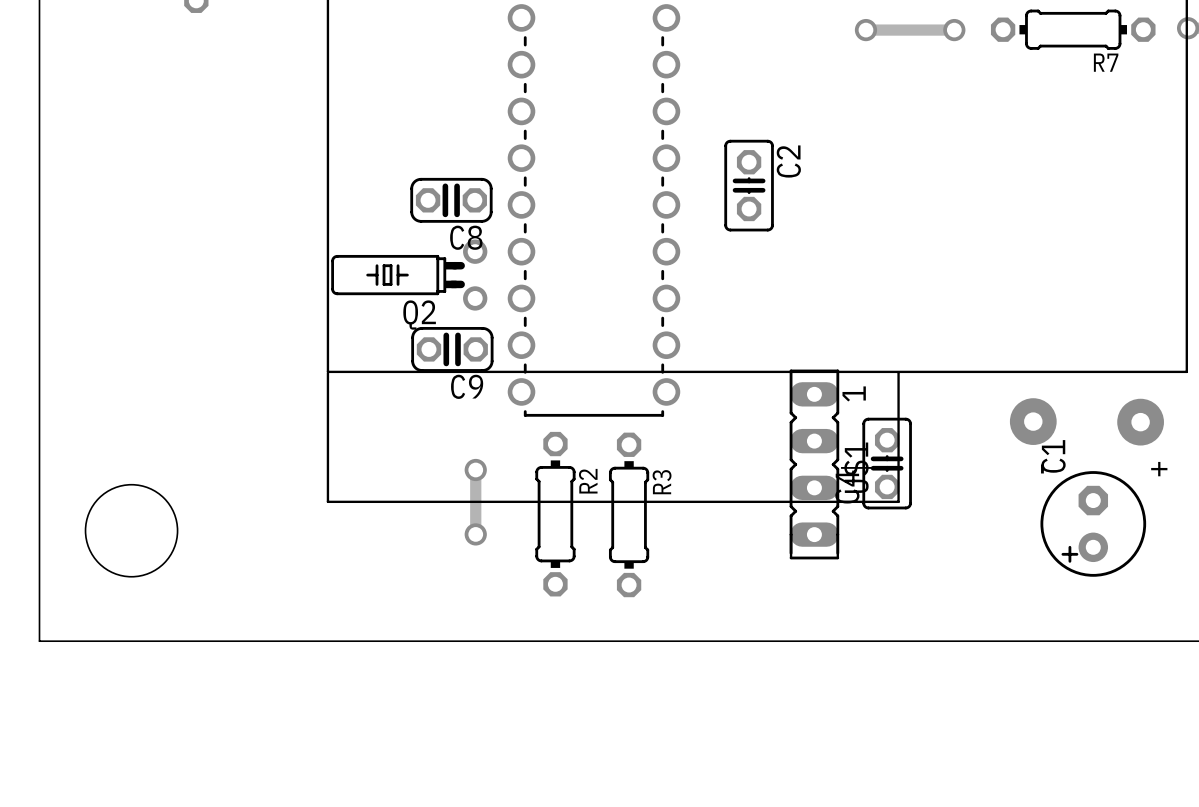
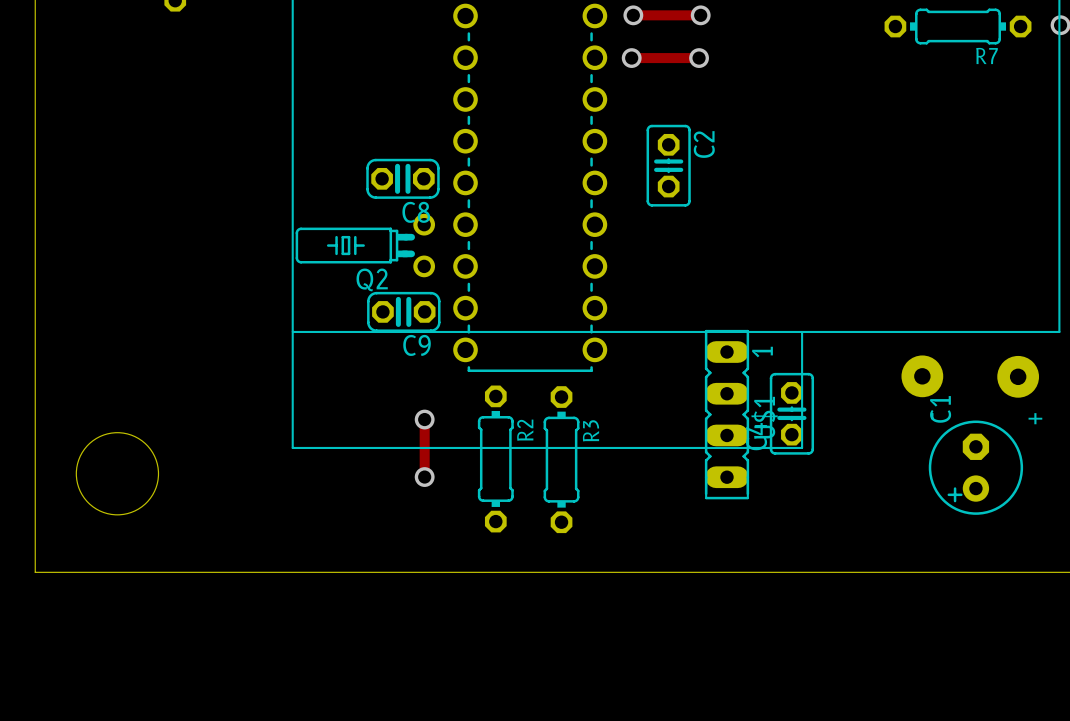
track: none -> (633, 15) (700, 15)
via: none -> (633, 15)
via: none -> (700, 15)
track: (865, 30) (954, 30) -> none
via: (865, 30) -> none
via: (954, 30) -> none
track: none -> (631, 58) (699, 58)
via: none -> (631, 58)
via: none -> (699, 58)

